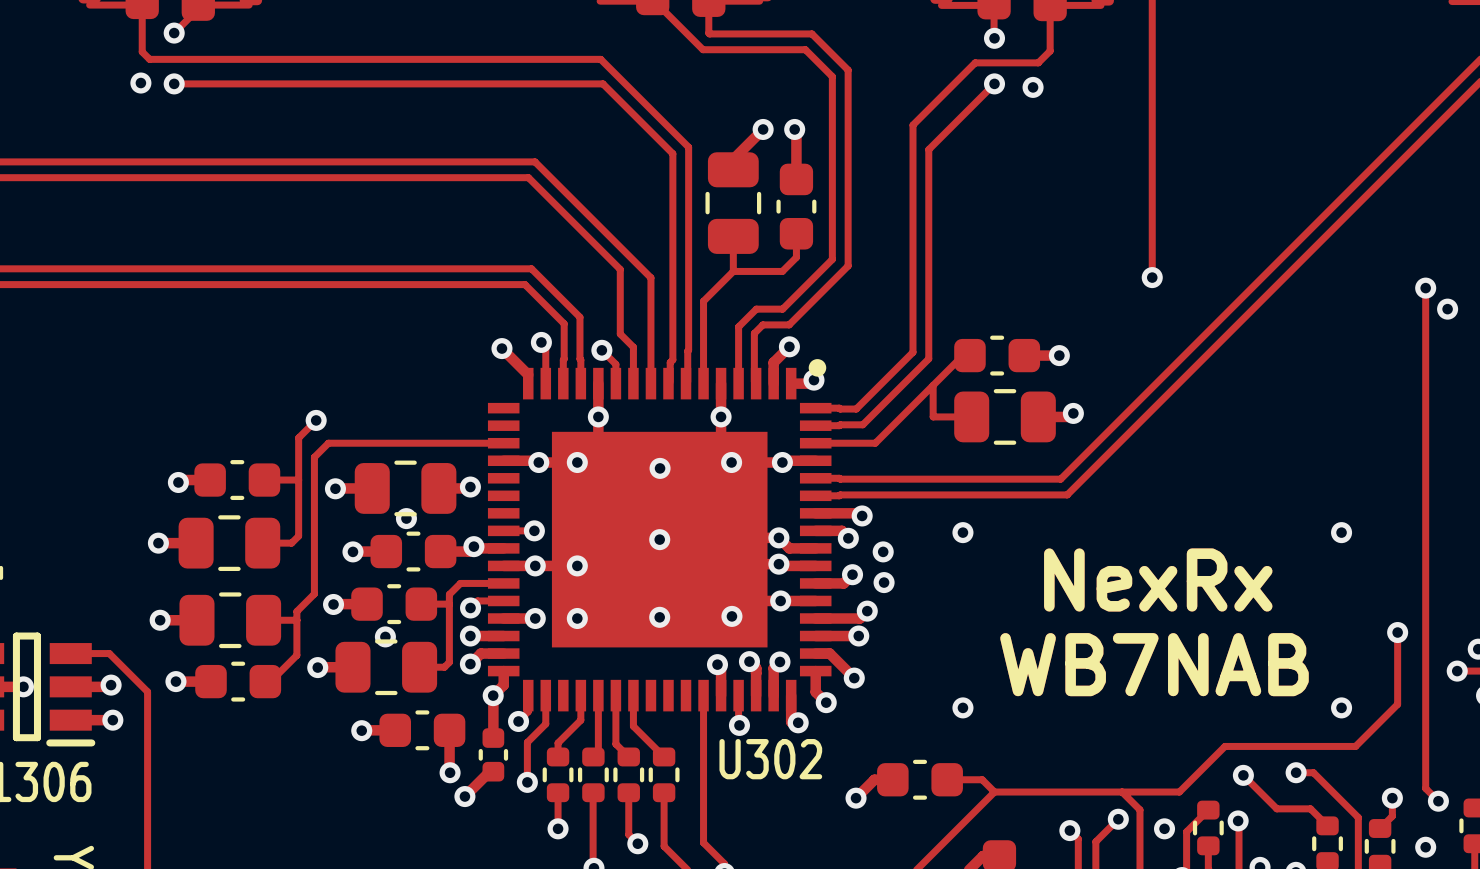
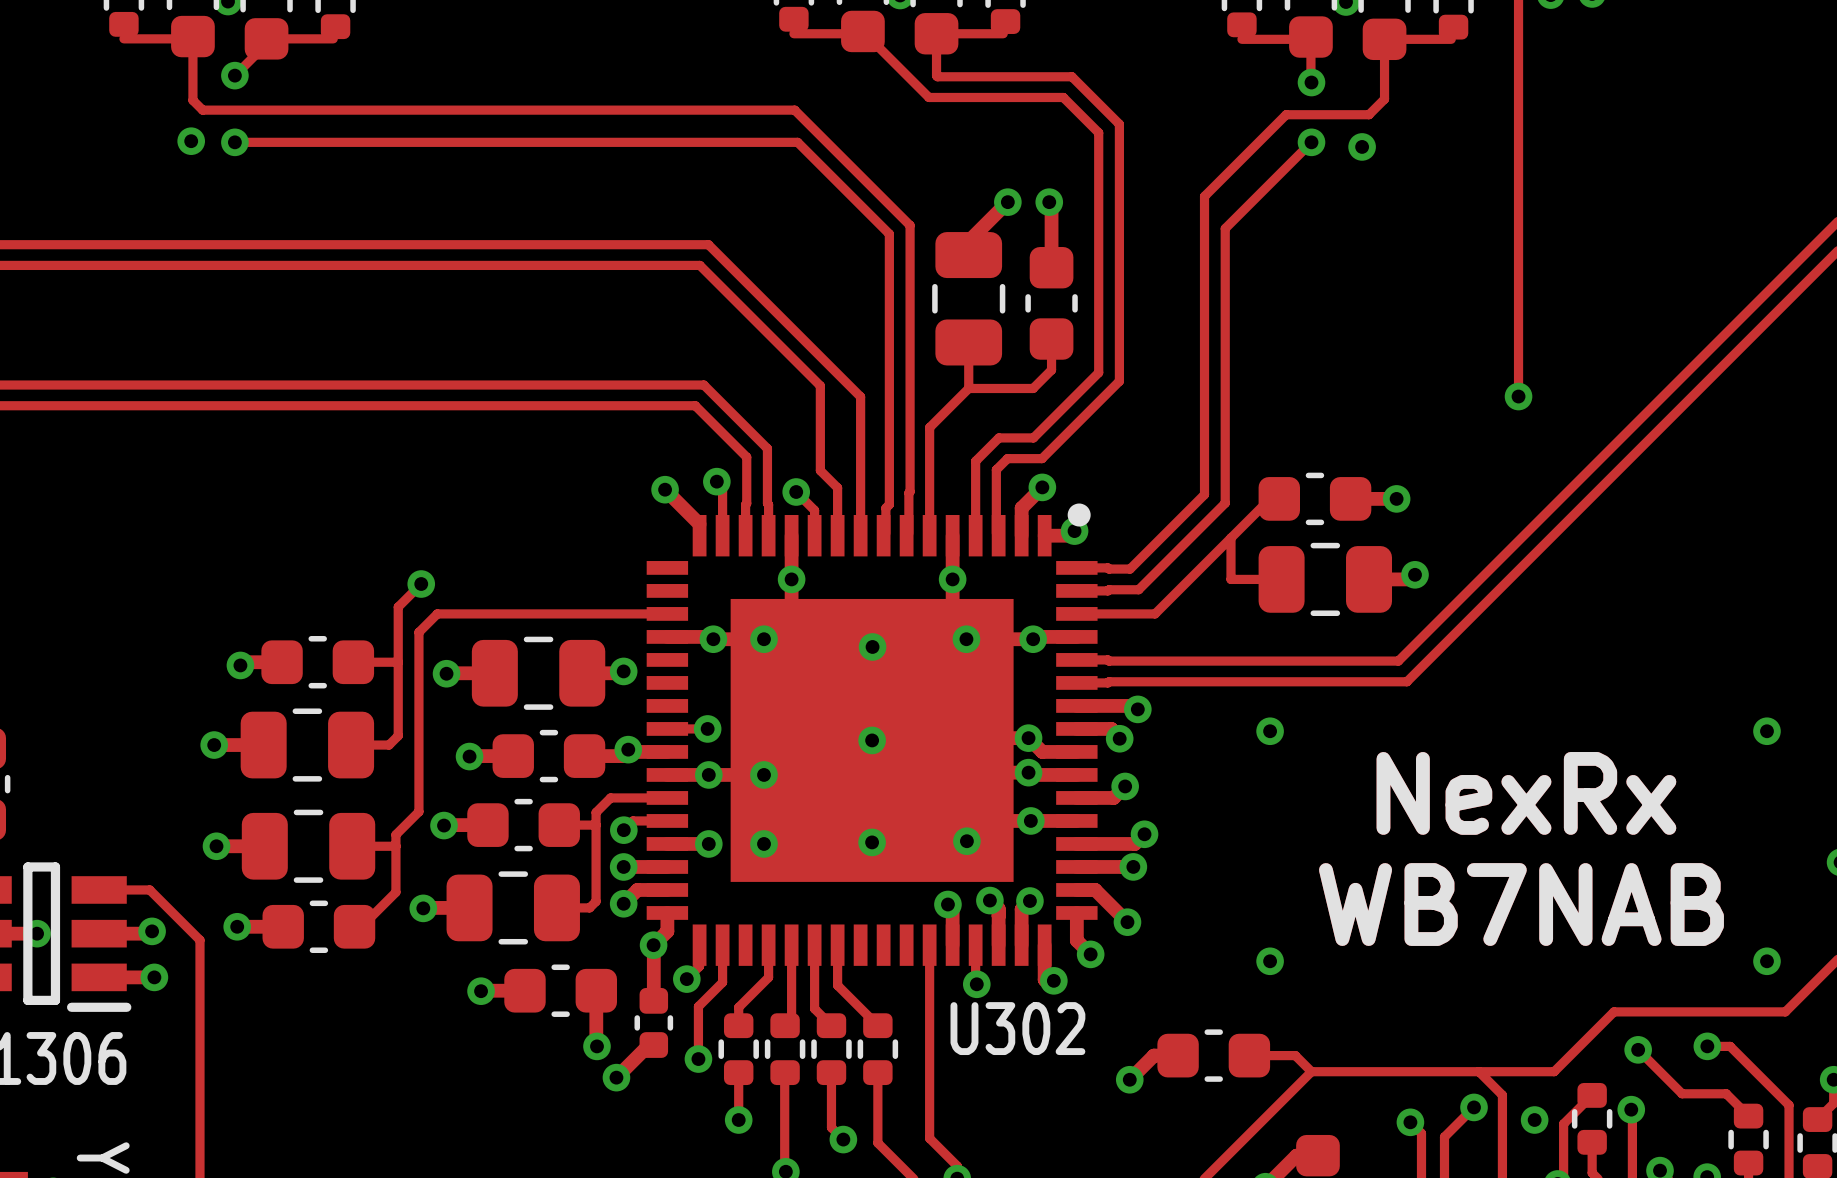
via: (406, 518) -> none
via: (883, 551) -> none
via: (884, 582) -> none
via: (385, 636) -> none

